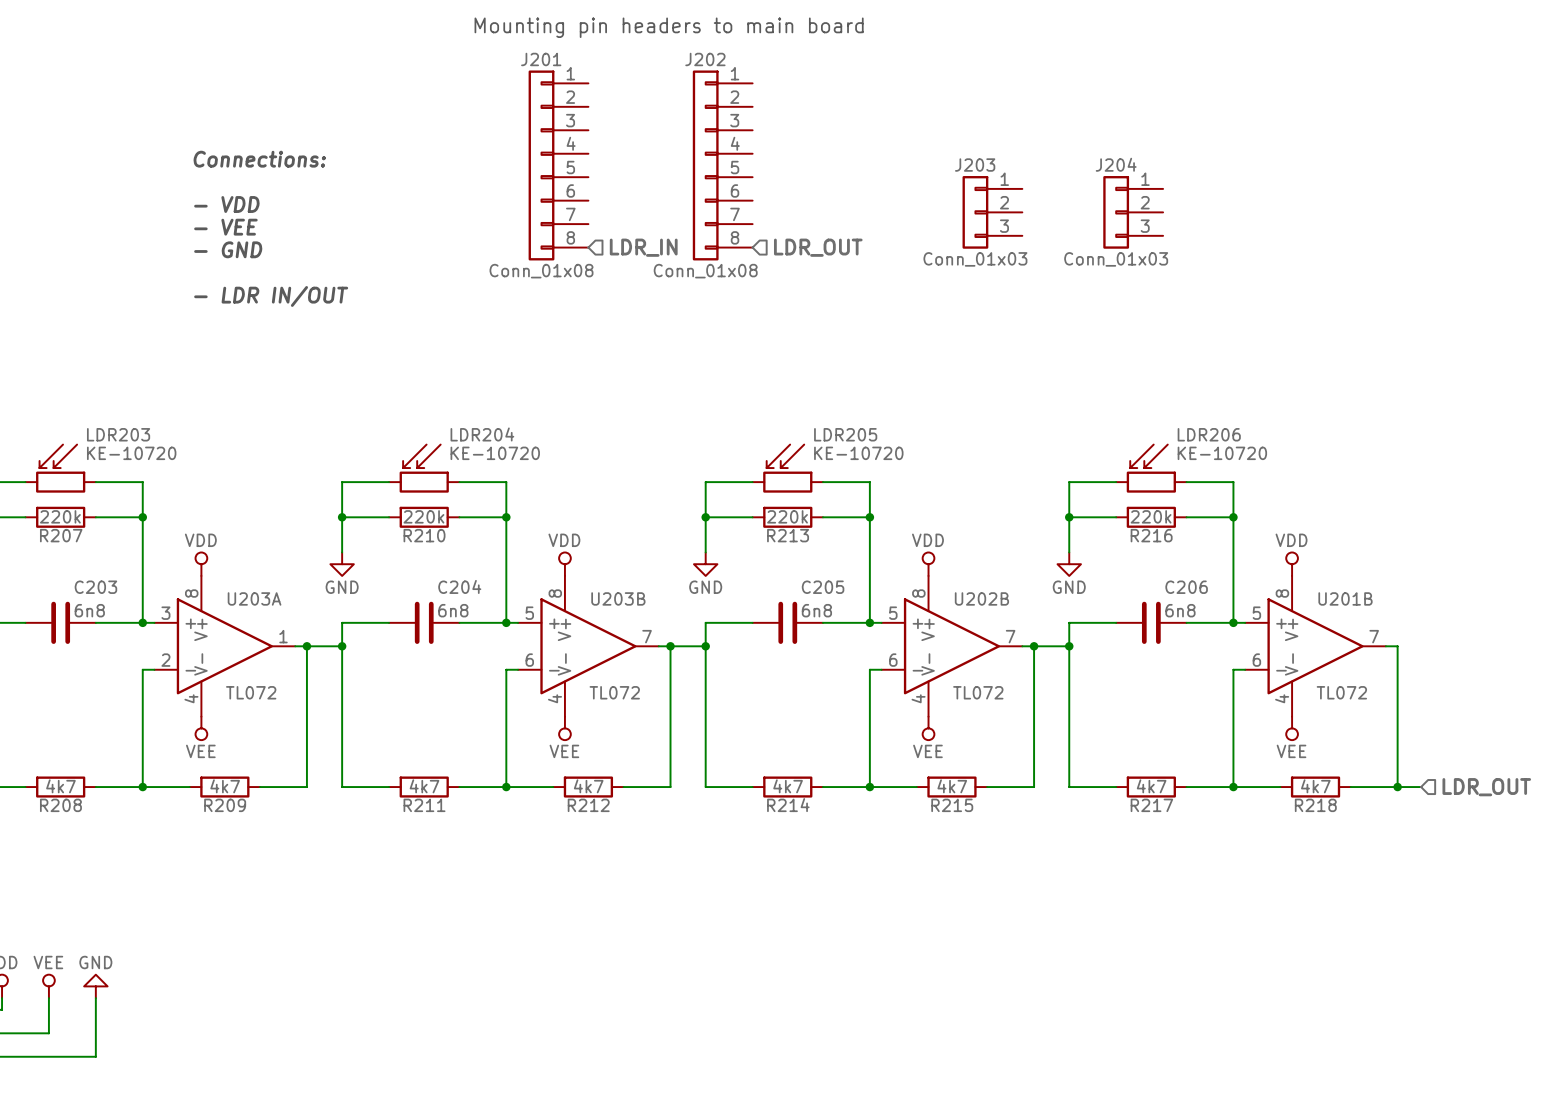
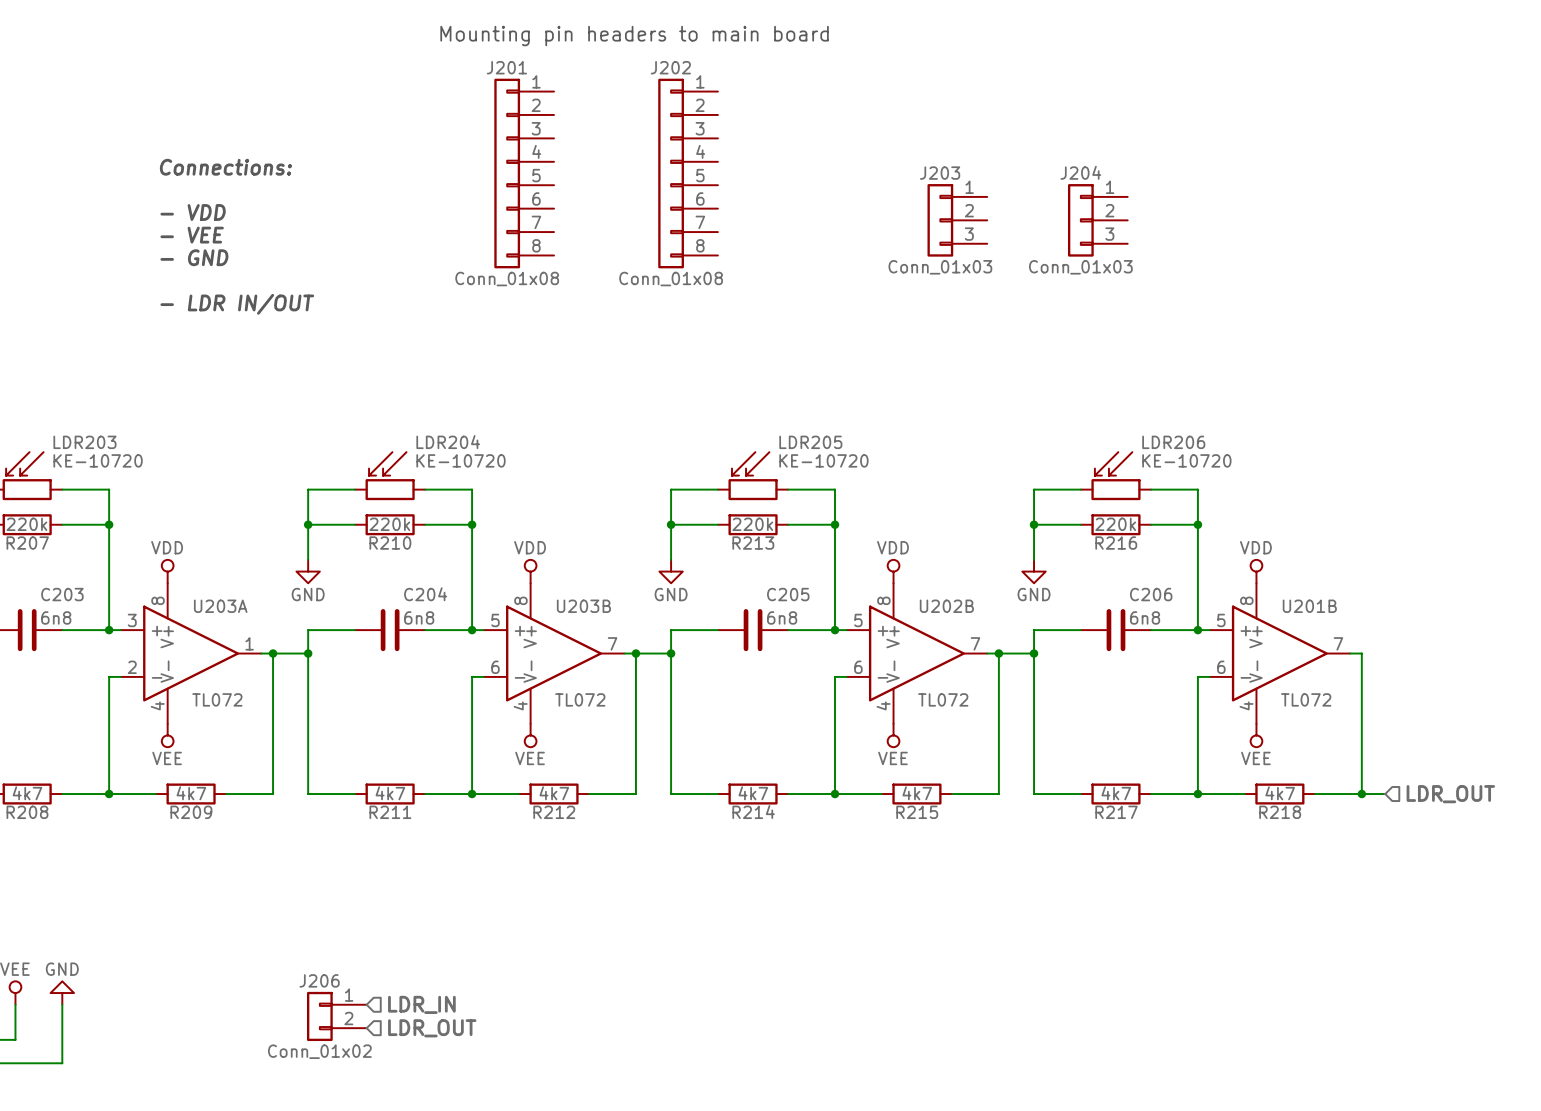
hierarchical label: LDR_IN (643, 247) -> none
hierarchical label: LDR_OUT (818, 247) -> none
hierarchical label: none -> LDR_IN (421, 1004)
J206: none -> Conn_01x02 (336, 1016)
hierarchical label: none -> LDR_OUT (432, 1028)

